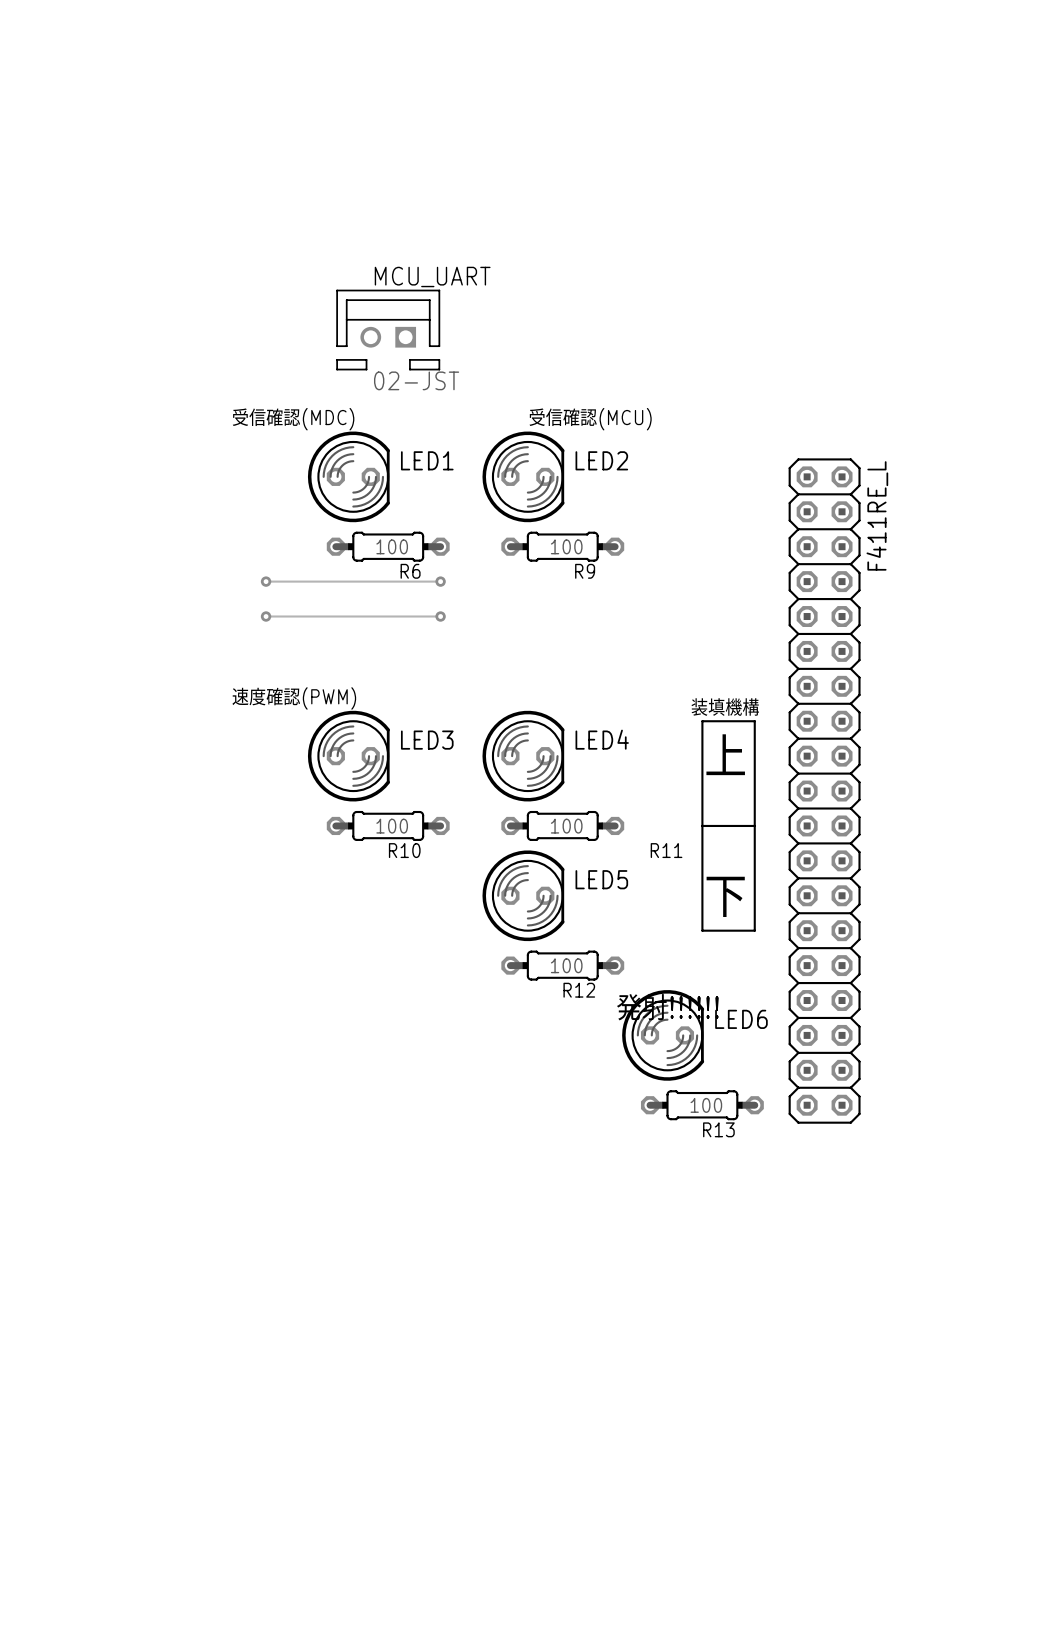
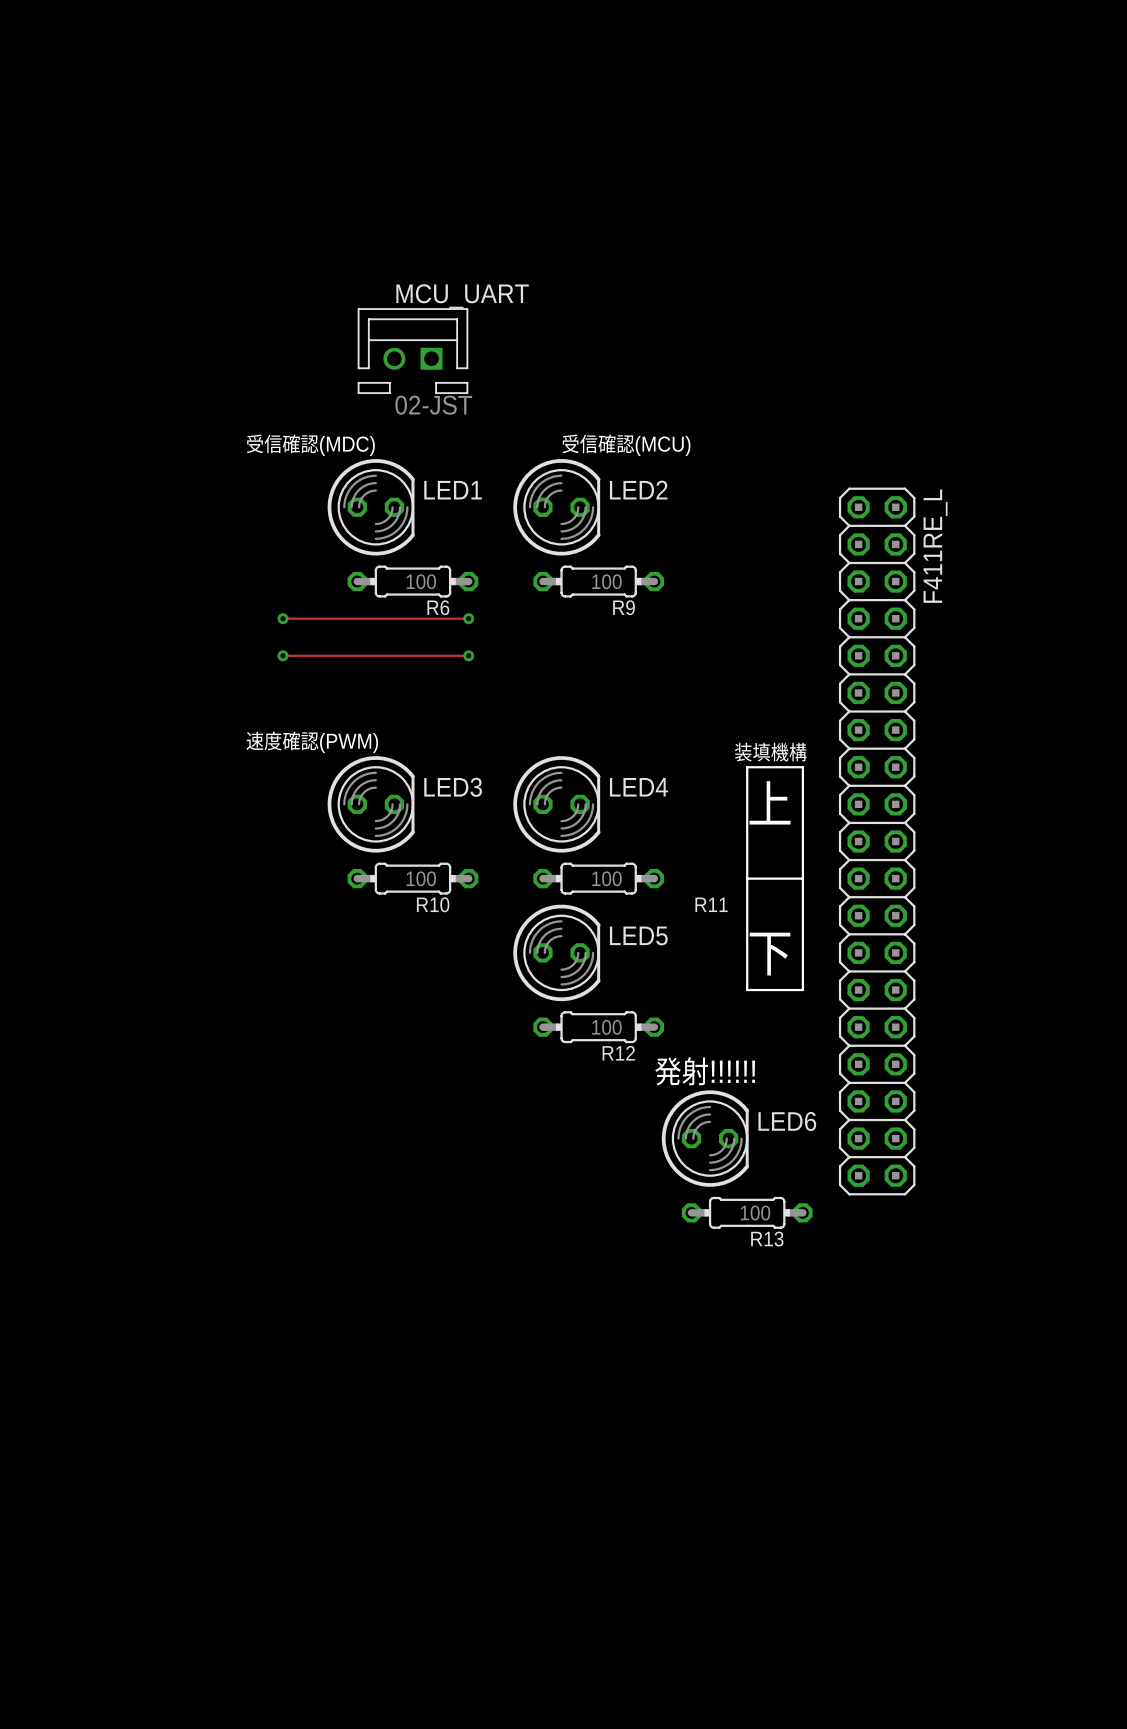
LED6 position: (663, 1035) -> (705, 1138)
R13 position: (702, 1105) -> (747, 1212)

